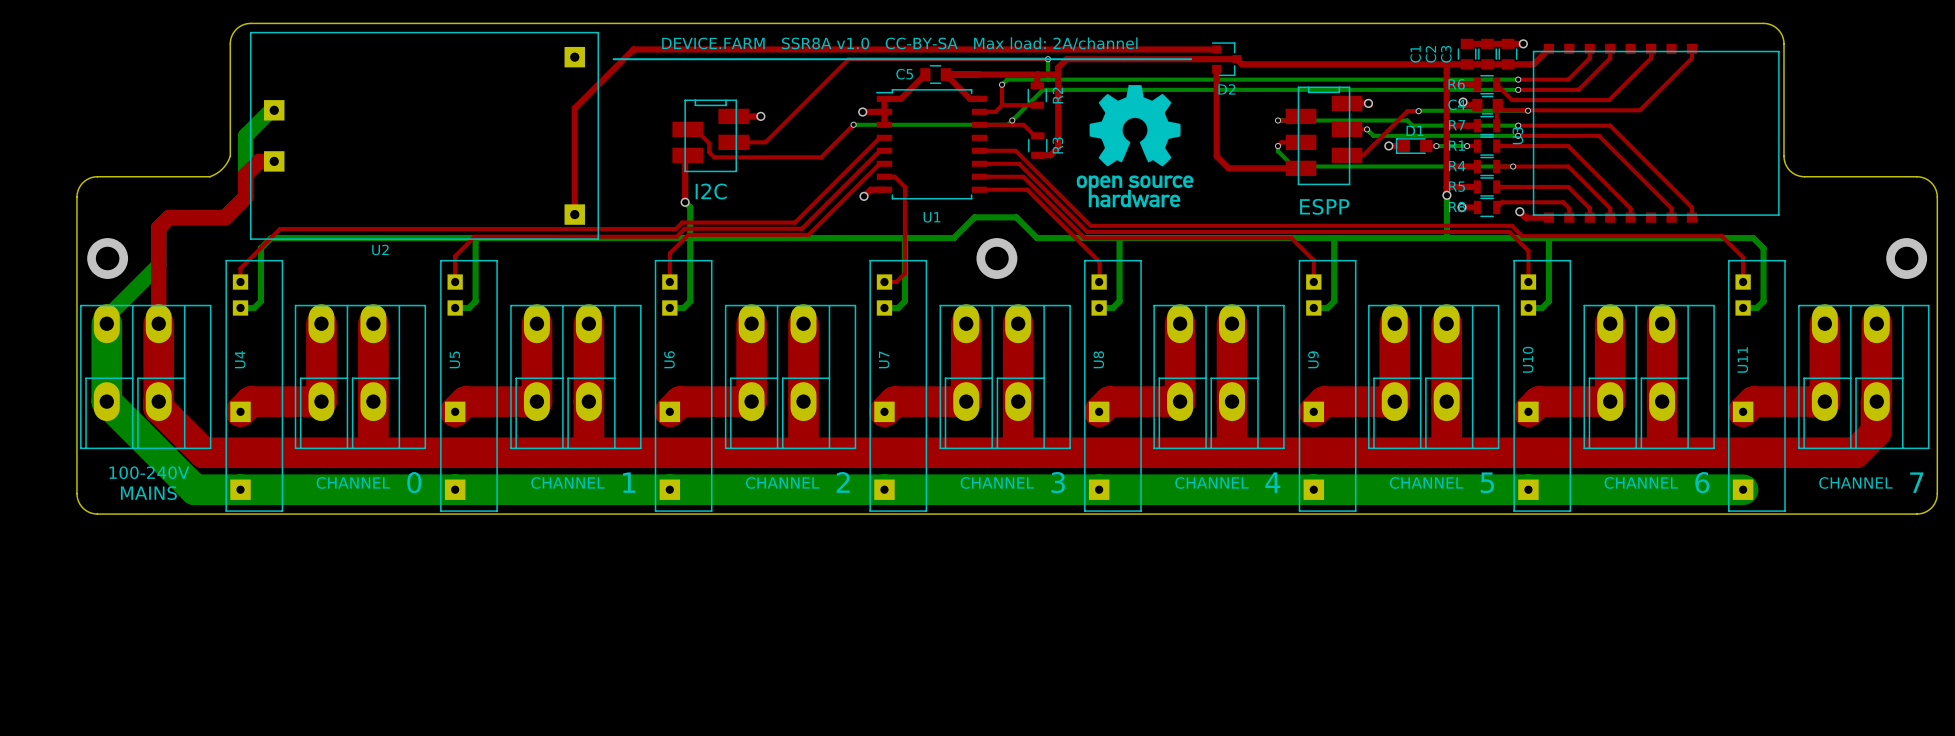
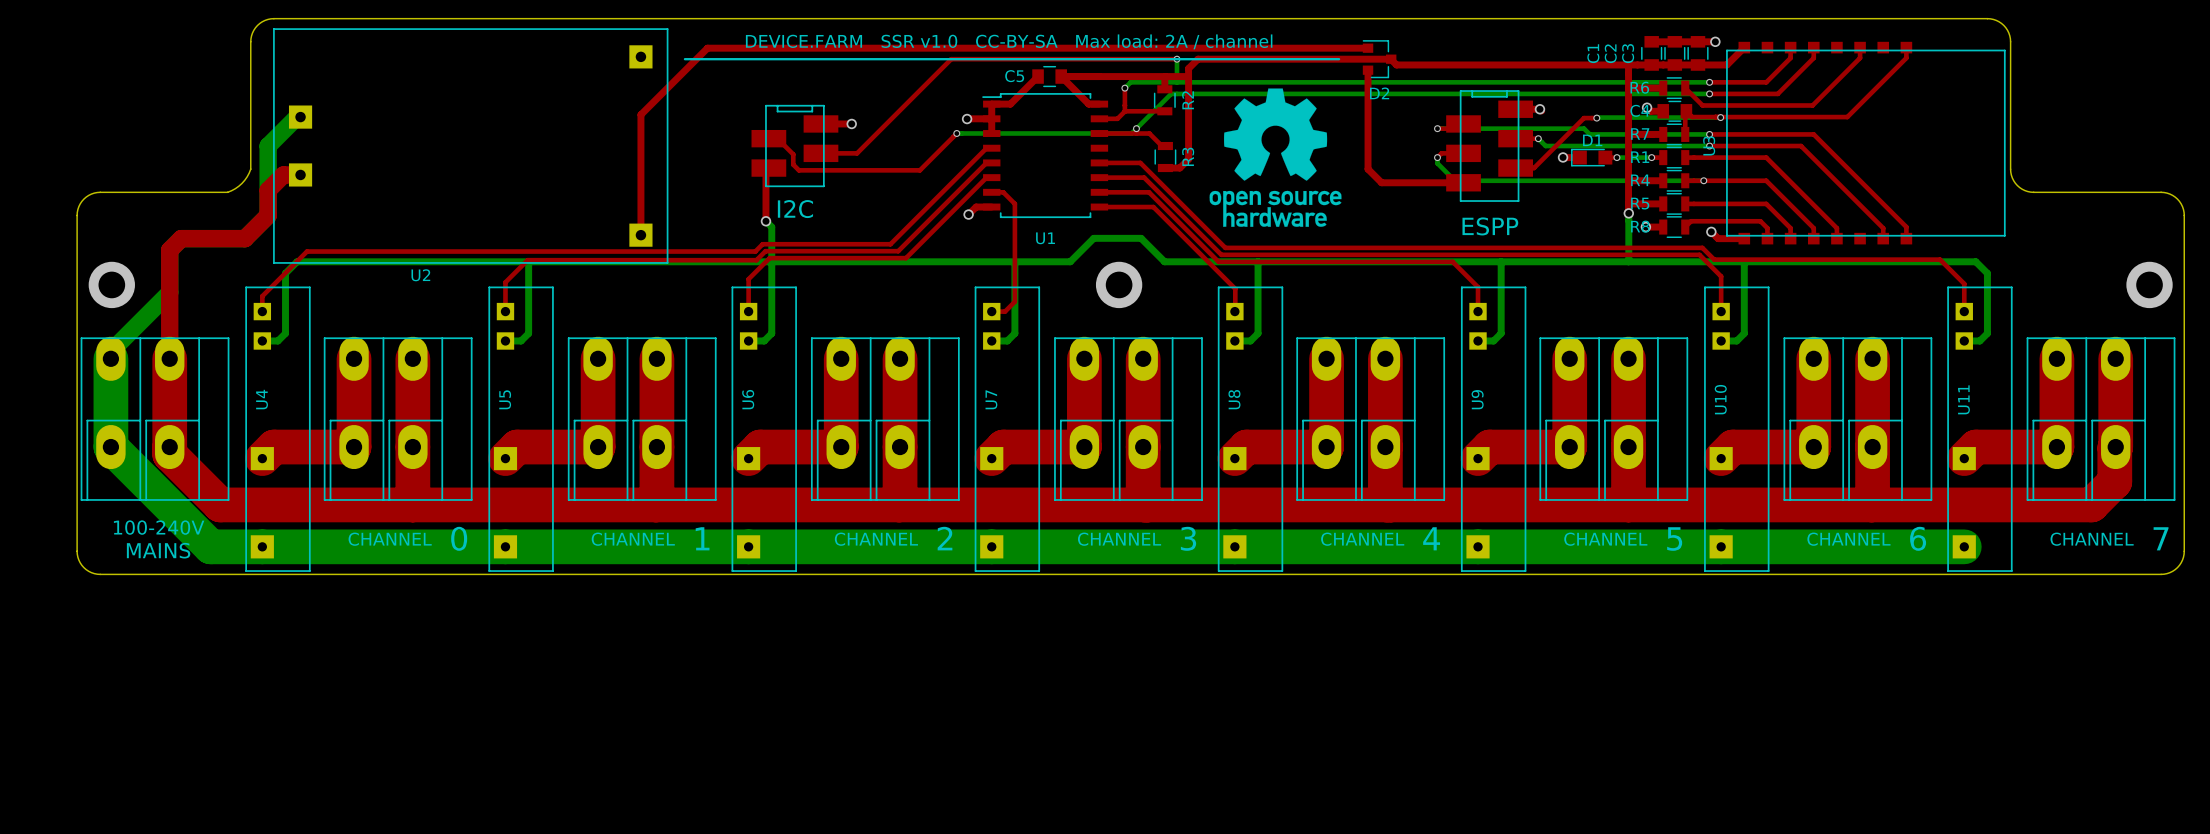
text: DEVICE.FARM SSR8A v1.0 CC-BY-SA Max load: 2A/channel (899, 43) -> DEVICE.FARM SSR v1.0 CC-BY-SA Max load: 2A / channel (1009, 41)

